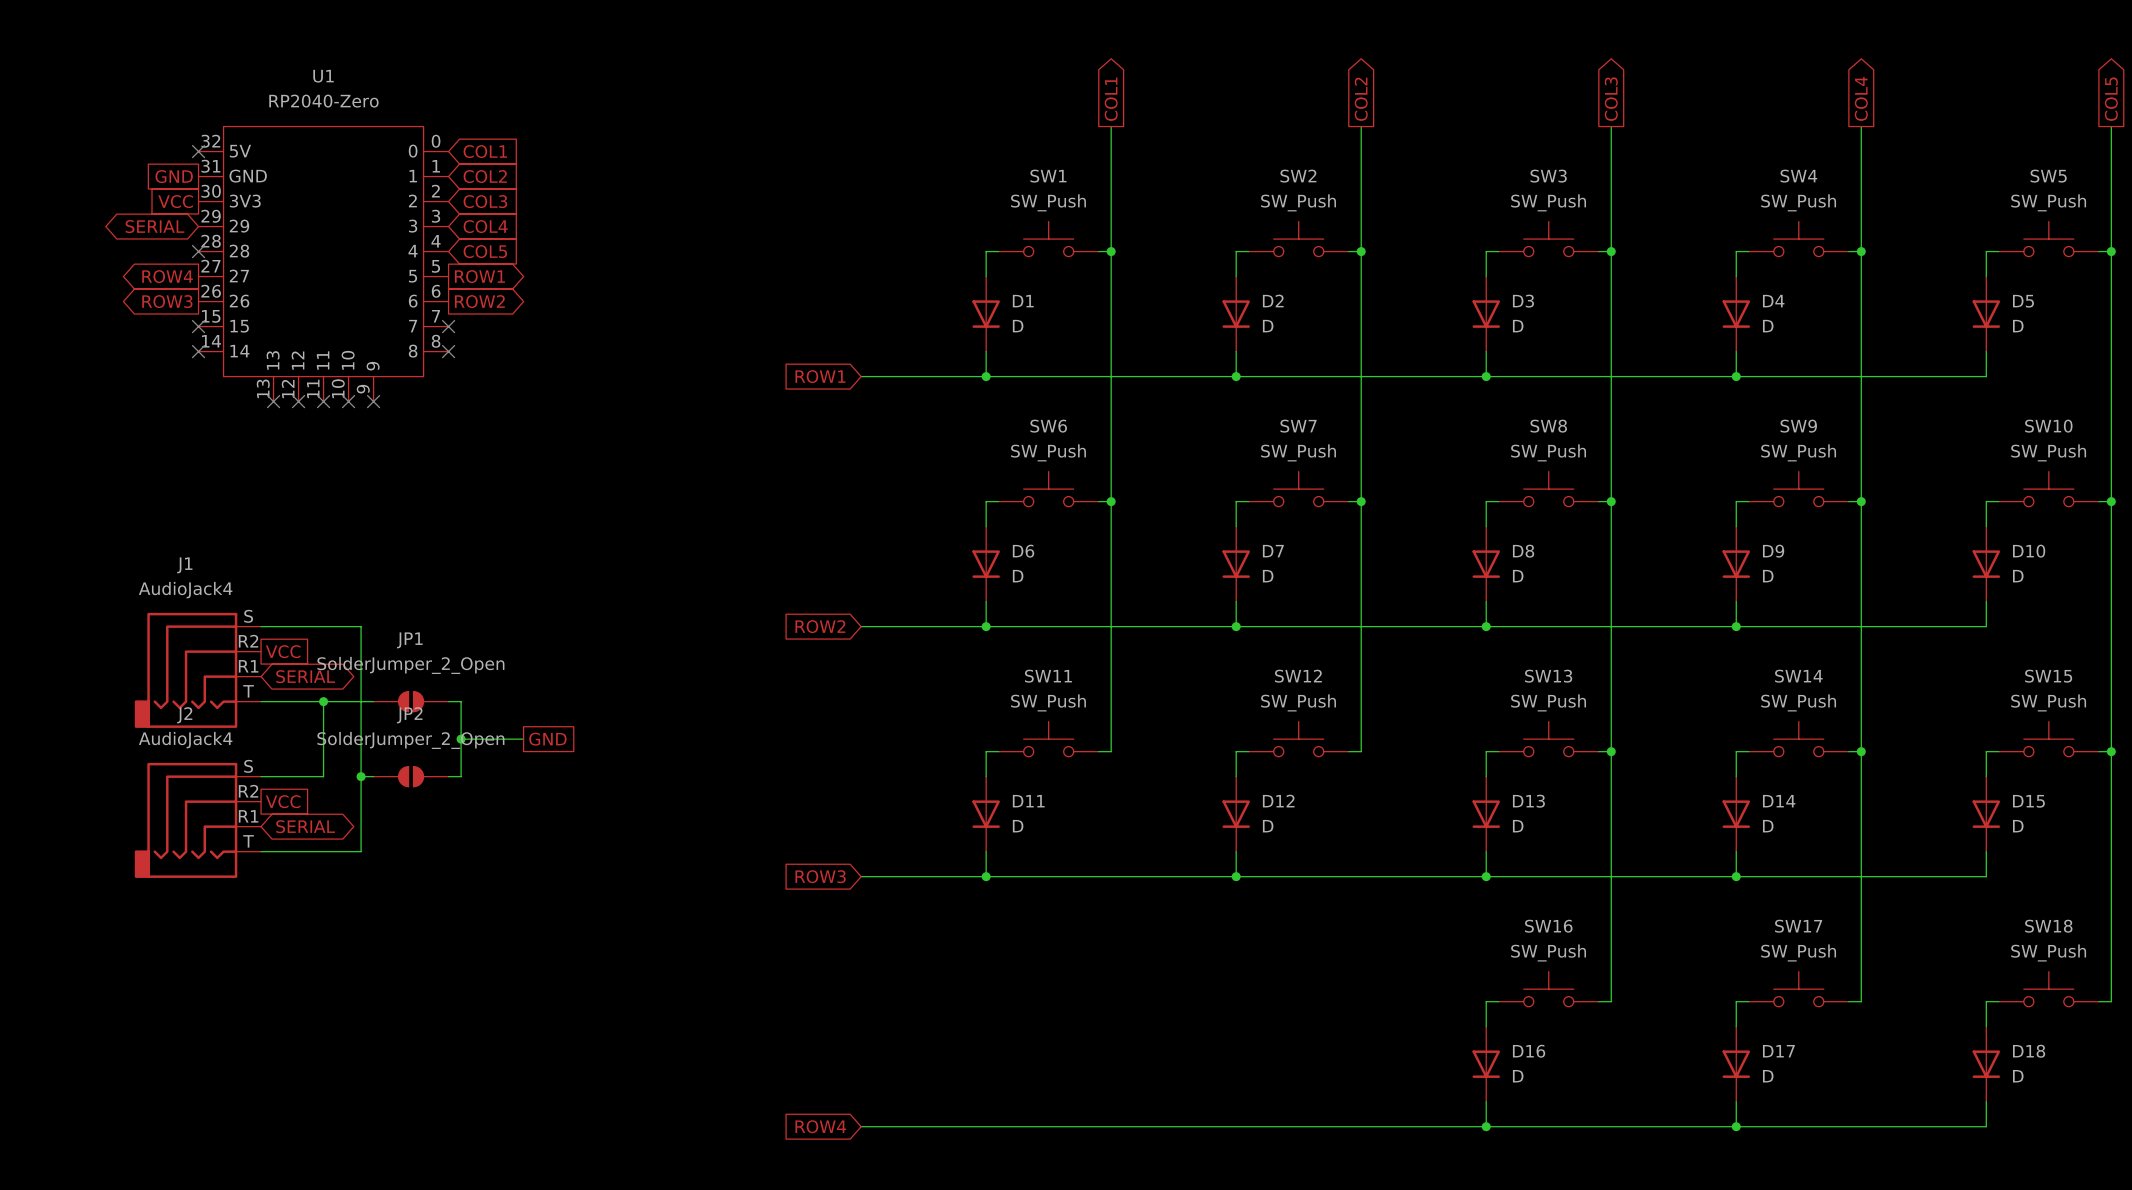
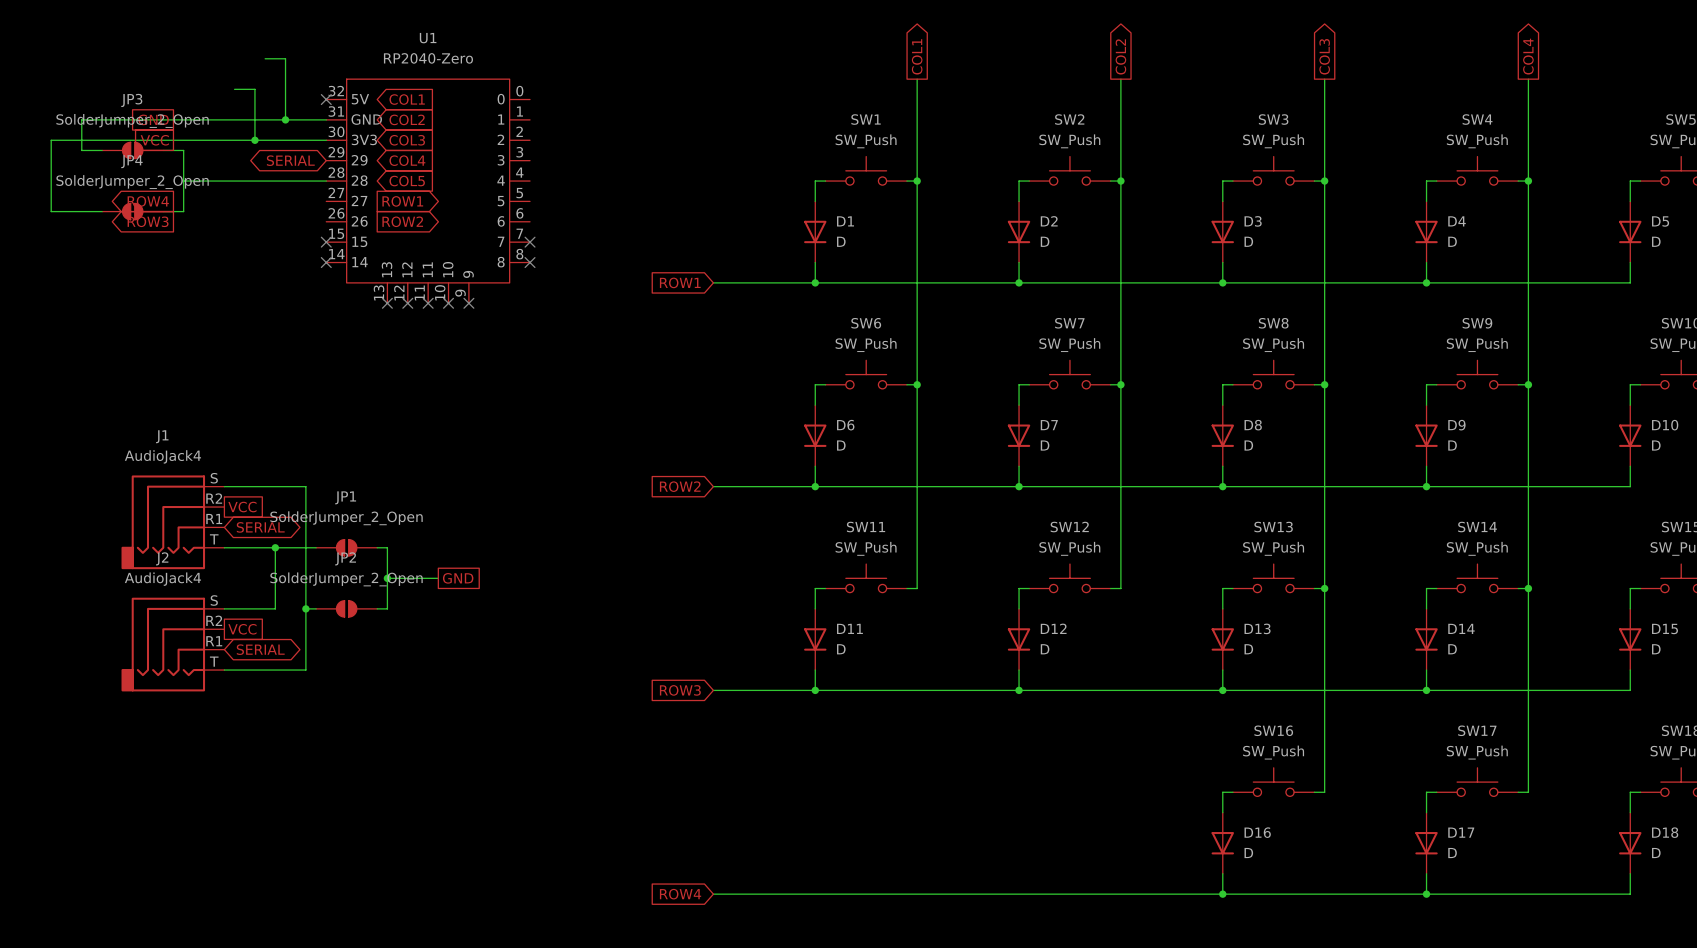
wire: none -> (265, 58) (285, 58) (285, 119)
wire: none -> (234, 89) (254, 89) (254, 140)
no-connect mark: (198, 151) -> none
no-connect mark: none -> (326, 99)
junction: none -> (285, 119)
wire: none -> (326, 119) (81, 119) (81, 150) (102, 150)
junction: none -> (254, 140)
wire: none -> (326, 140) (51, 140) (51, 211) (102, 211)
JP3: none -> SolderJumper_2_Open (132, 150)
wire: none -> (163, 150) (183, 150) (183, 211) (163, 211)
global label position: SERIAL (155, 226) -> SERIAL (290, 160)
no-connect mark: (198, 251) -> none
wire: none -> (183, 181) (326, 181)
U1 position: (323, 264) -> (428, 191)
JP4: none -> SolderJumper_2_Open (132, 211)
no-connect mark: (198, 326) -> none
no-connect mark: none -> (326, 242)
no-connect mark: (448, 326) -> none
no-connect mark: none -> (530, 242)
no-connect mark: (198, 351) -> none
no-connect mark: none -> (326, 262)
no-connect mark: (448, 351) -> none
no-connect mark: none -> (530, 262)
no-connect mark: (273, 401) -> none
no-connect mark: (298, 401) -> none
no-connect mark: (323, 401) -> none
no-connect mark: (348, 401) -> none
no-connect mark: (373, 401) -> none
no-connect mark: none -> (387, 303)
no-connect mark: none -> (407, 303)
no-connect mark: none -> (428, 303)
no-connect mark: none -> (448, 303)
no-connect mark: none -> (468, 303)

